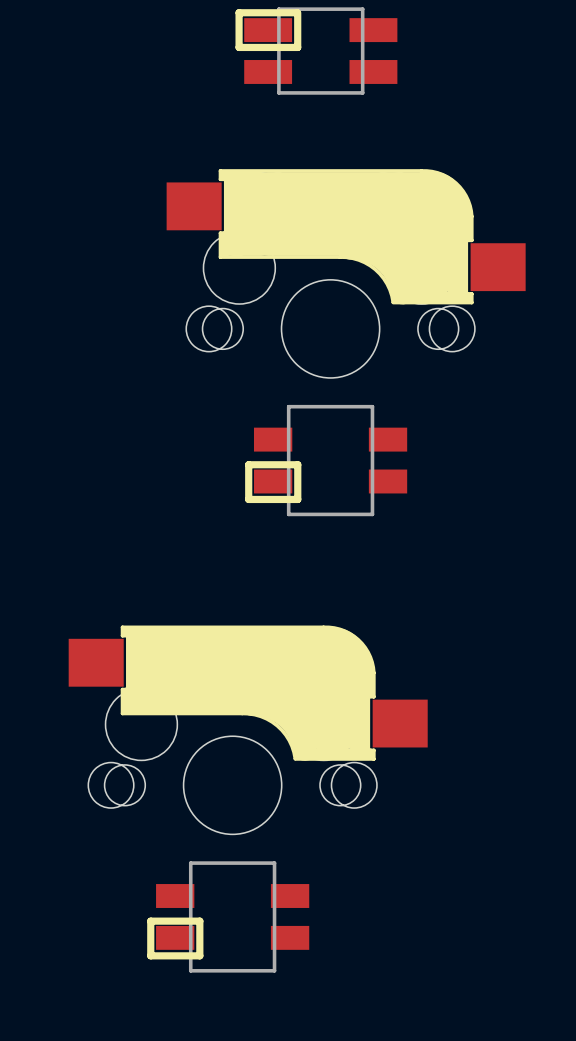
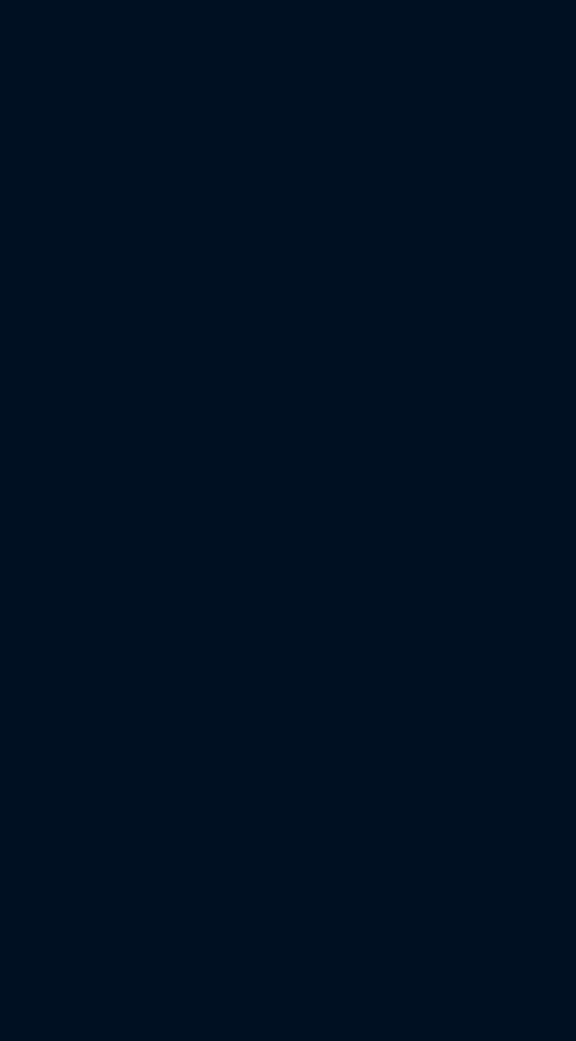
part: (316, 51) -> none
part: (346, 342) -> none
part: (248, 799) -> none

